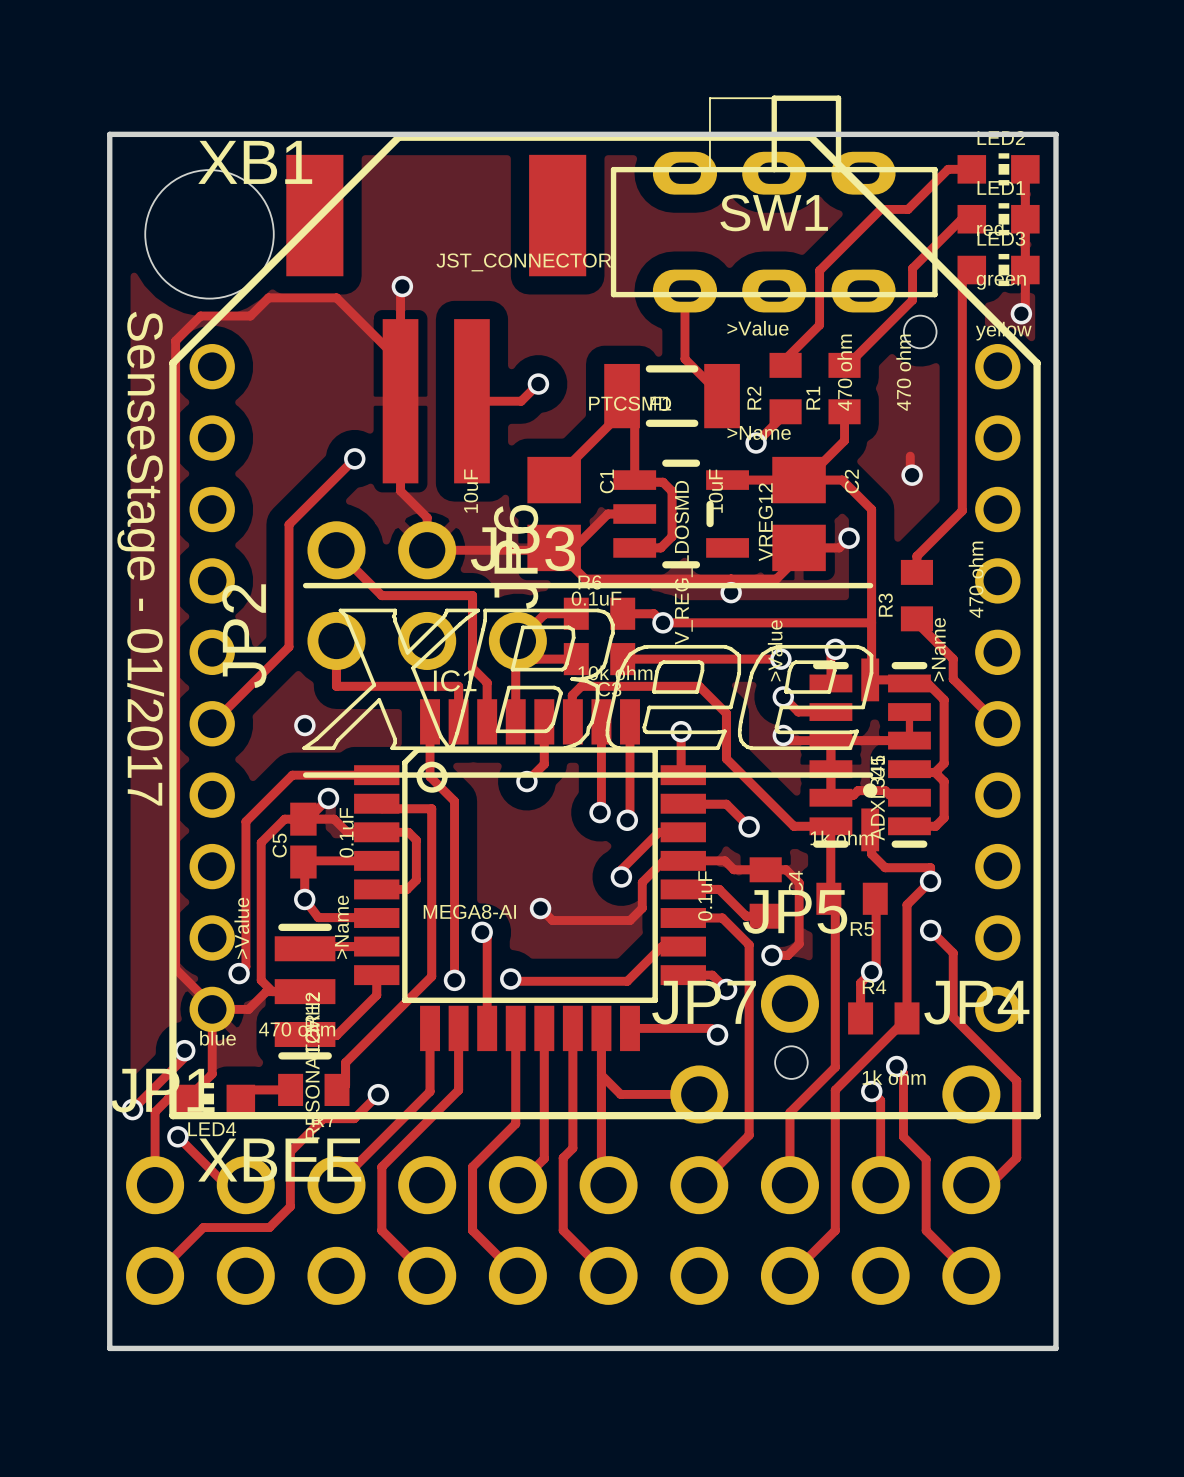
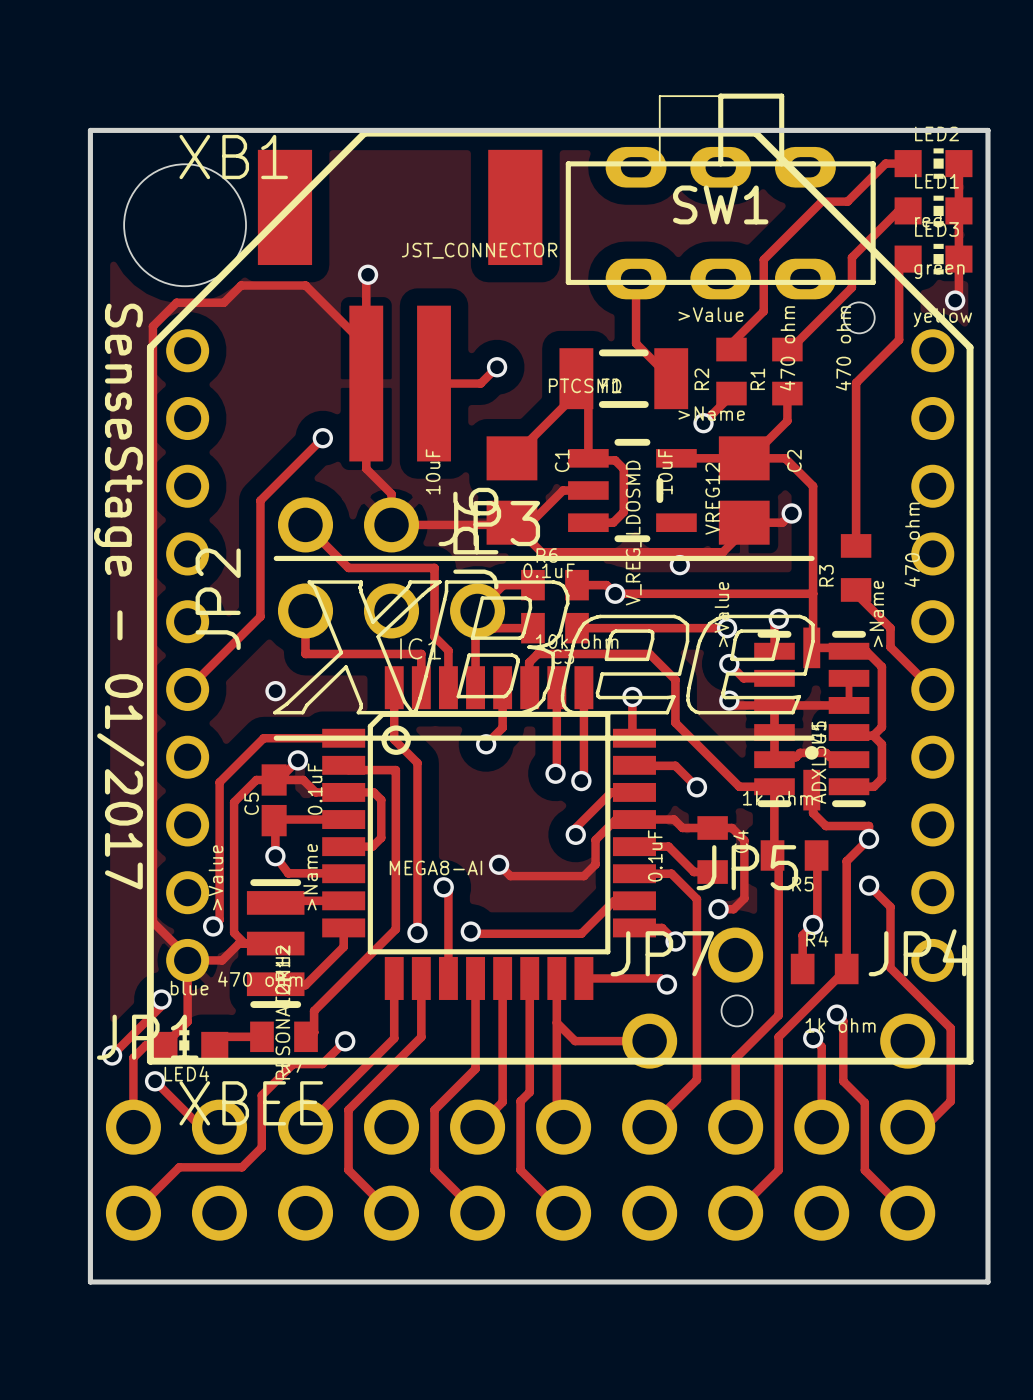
track: (962, 355) (962, 510) (916, 556) -> (899, 339) (856, 382) (856, 530)
track: (910, 456) (910, 473) (912, 475) -> none
via: (912, 475) -> none

